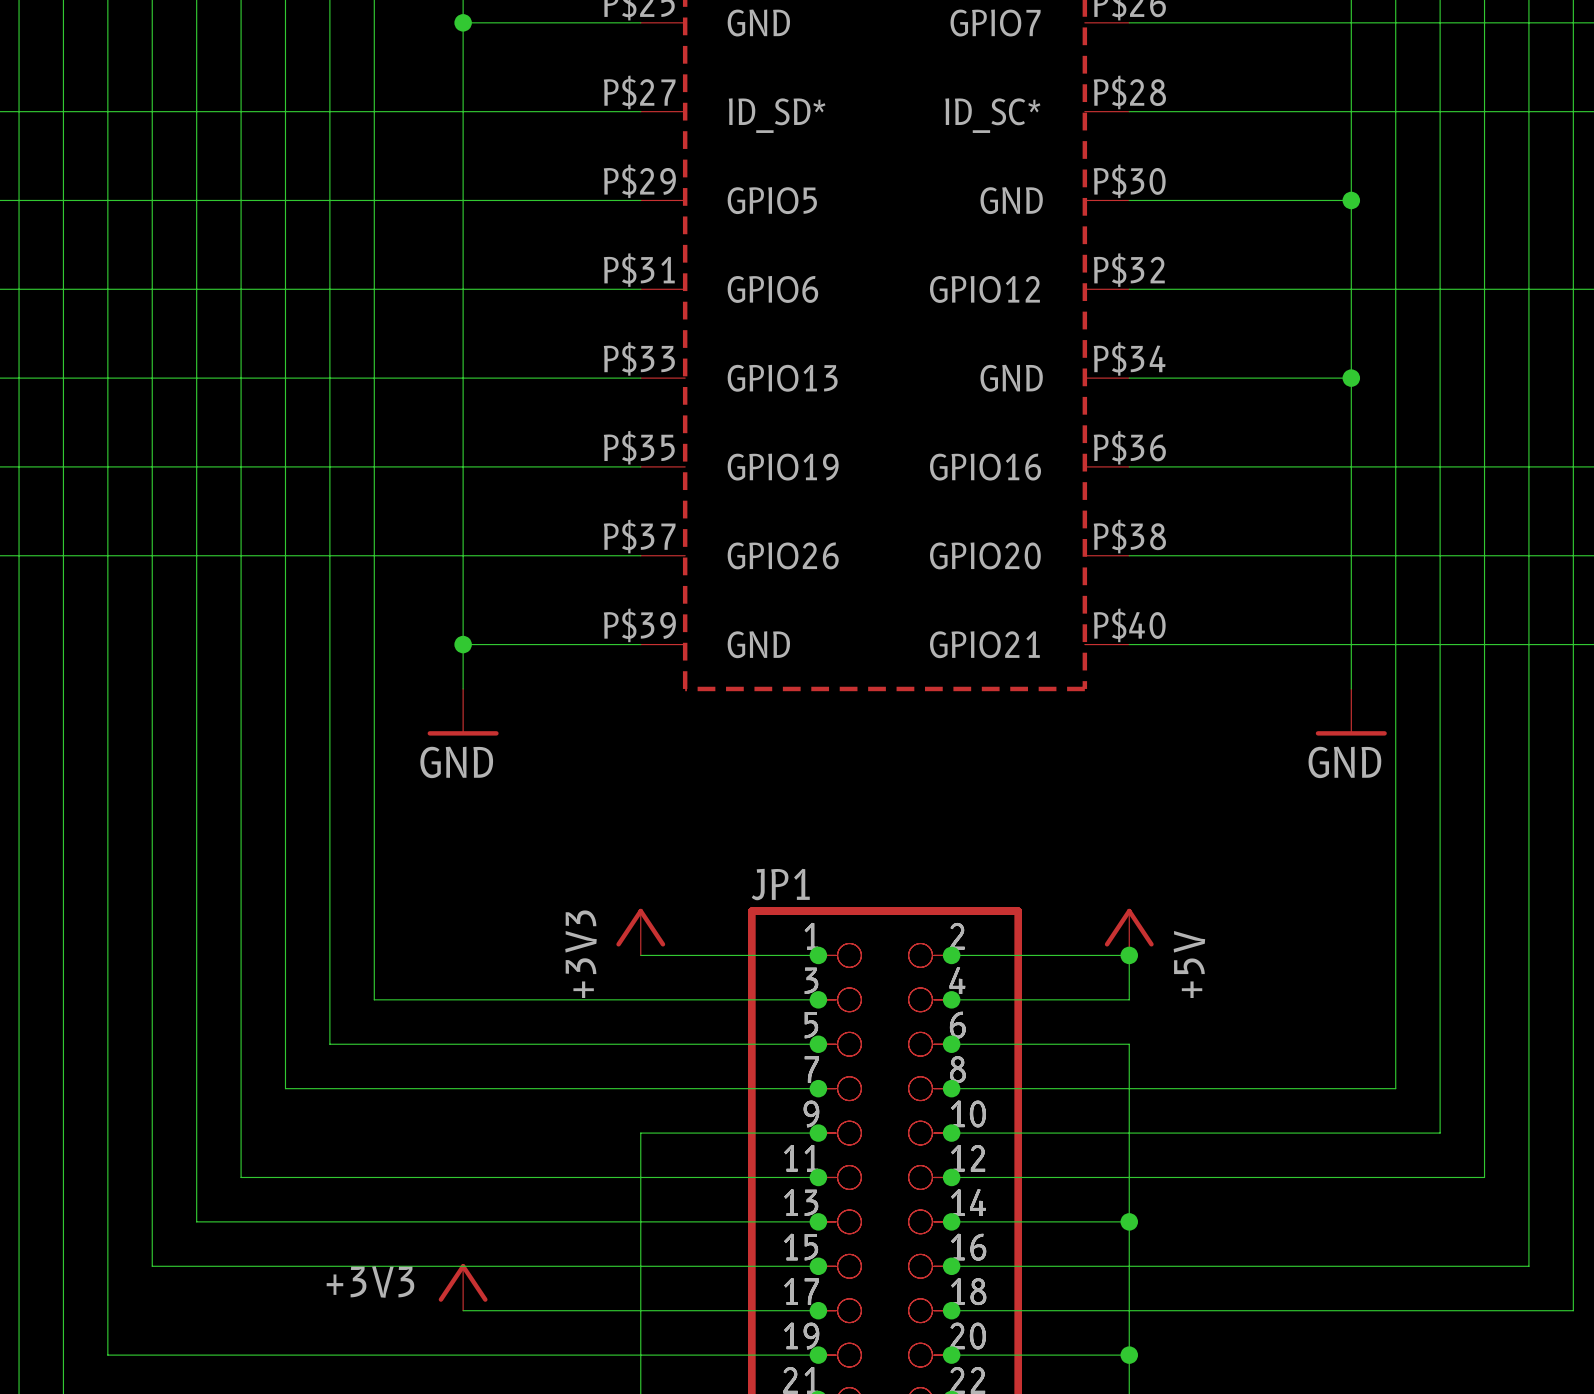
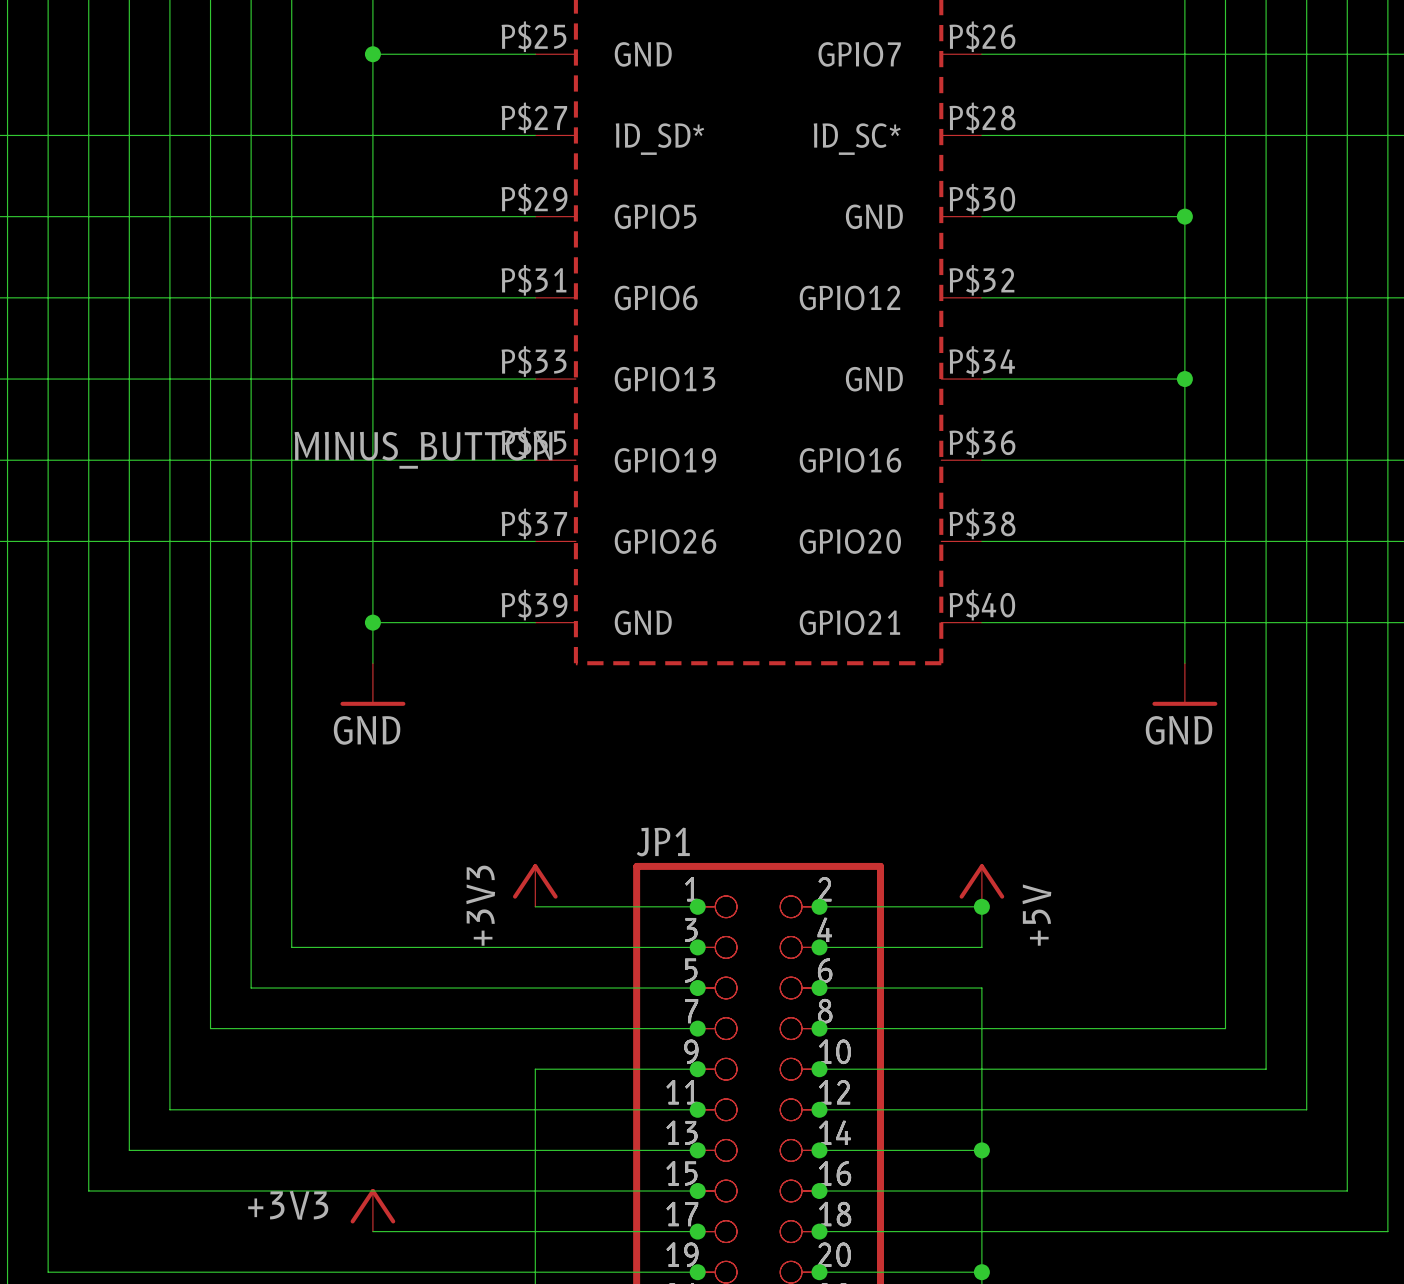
label: none -> MINUS_BUTTON (423, 450)

